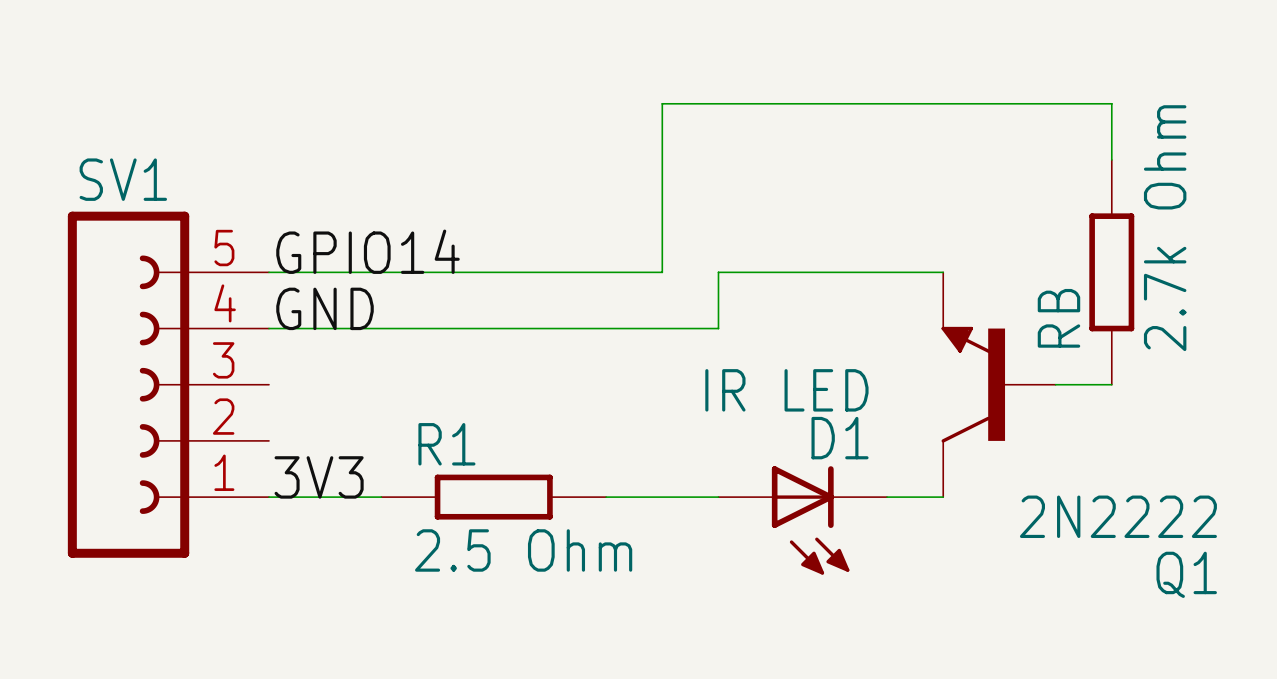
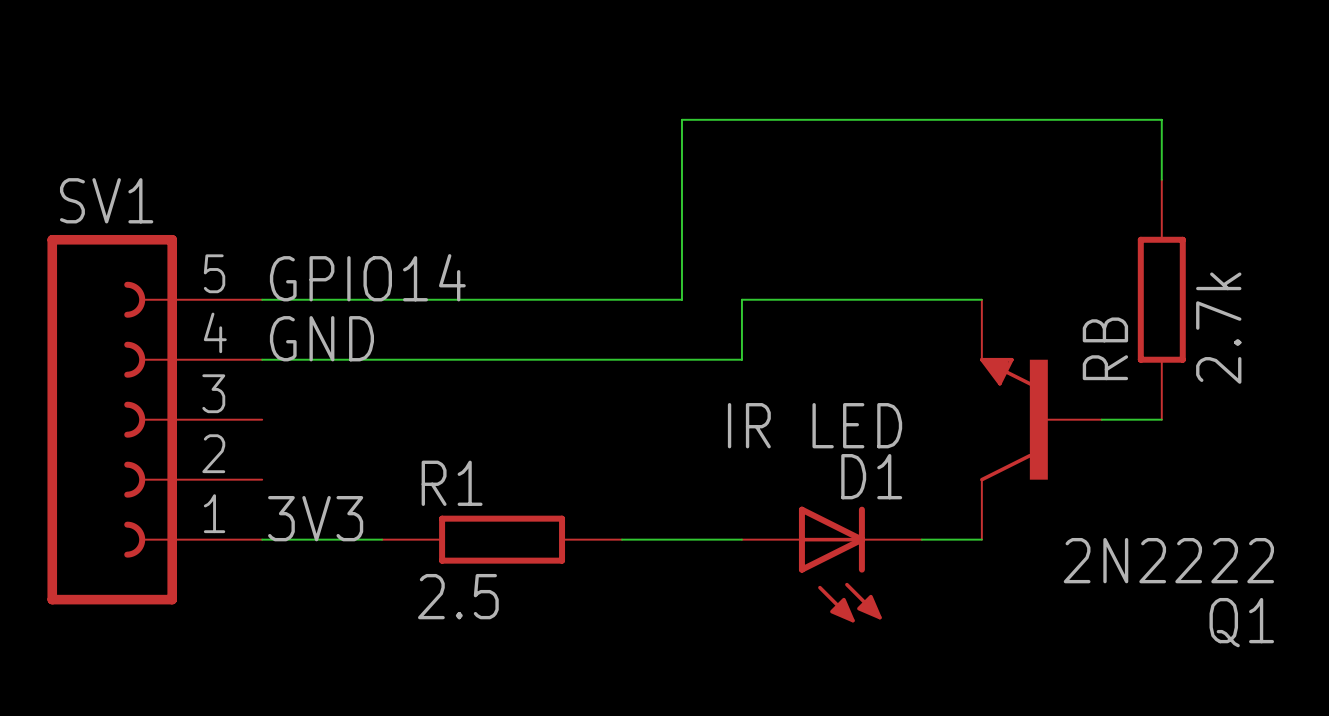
RB value: 2.7k Ohm (1165, 228) -> 2.7k (1218, 328)
R1 value: 2.5 Ohm (523, 550) -> 2.5 (458, 596)

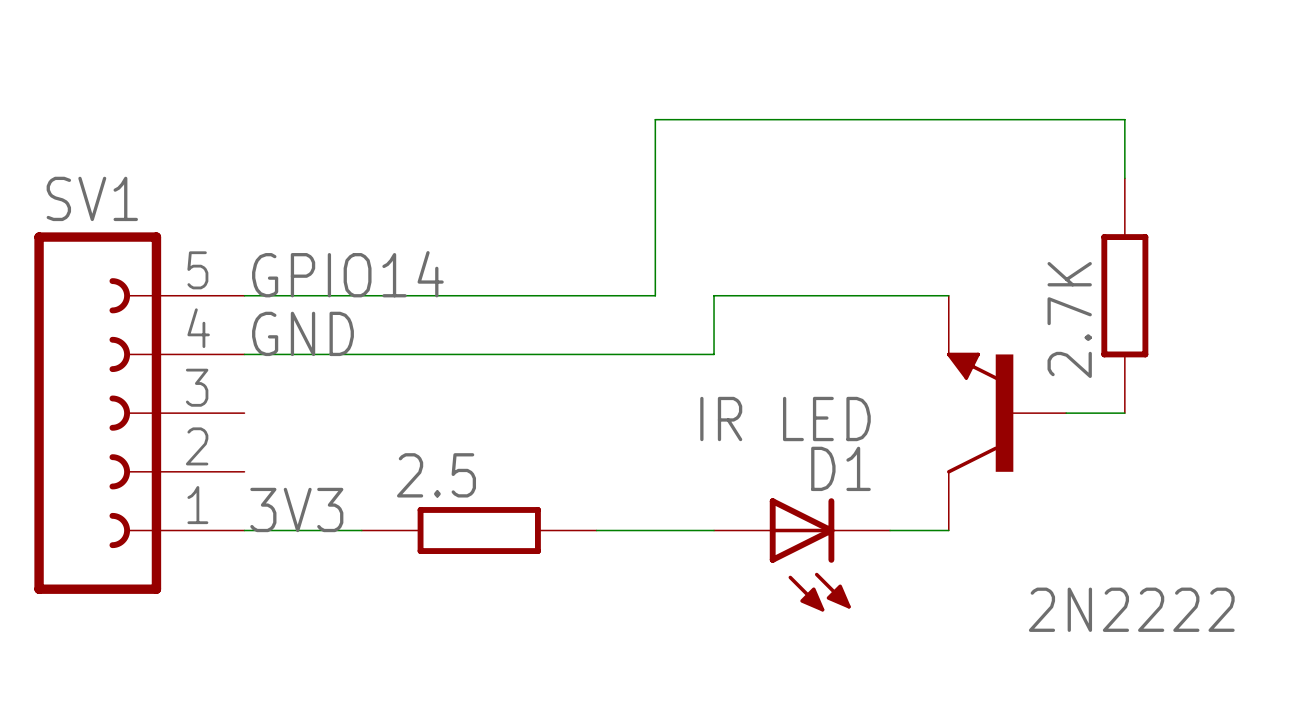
RB value: 2.7k (1218, 328) -> none
RB name: RB (1105, 348) -> 2.7K (1069, 320)
R1 name: R1 (452, 483) -> 2.5 (436, 475)
Q1 value: 2N2222 (1168, 560) -> none
R1 value: 2.5 (458, 596) -> none
Q1 name: Q1 (1241, 622) -> 2N2222 (1131, 609)

